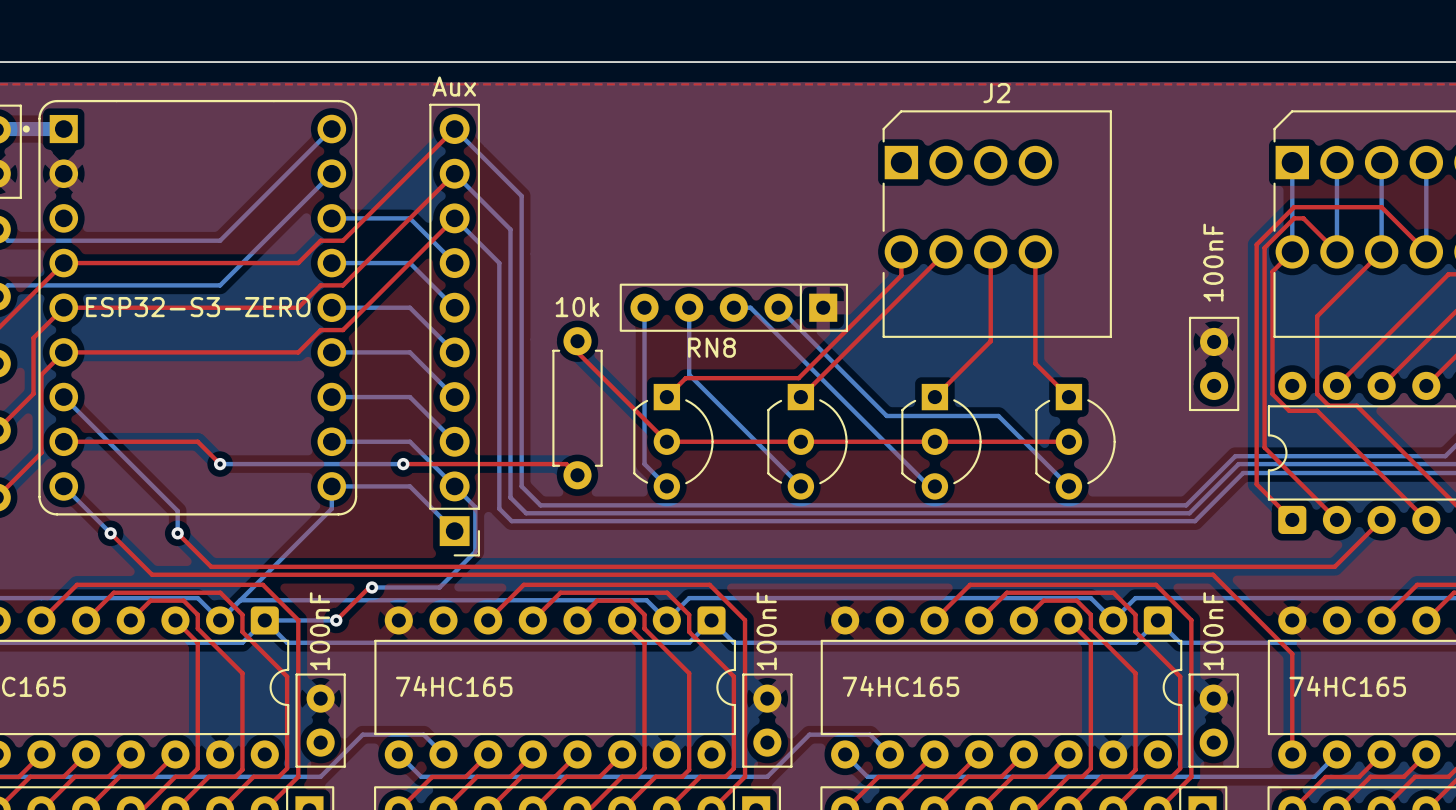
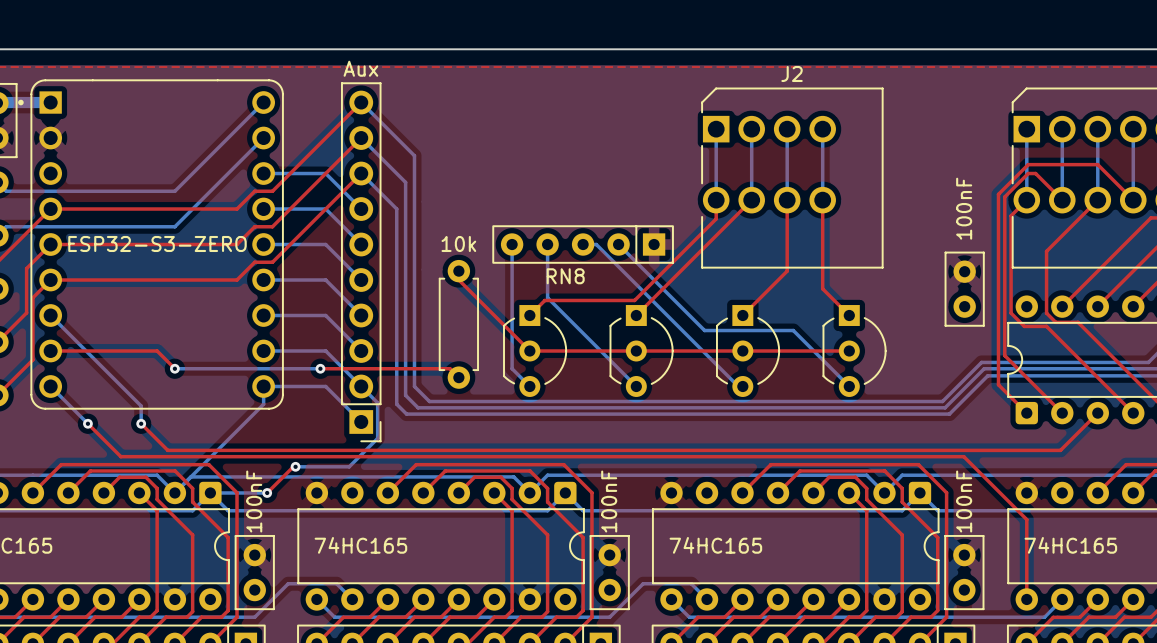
bottom track: none -> (716, 129) (716, 200)
bottom track: none -> (751, 129) (751, 200)
bottom track: none -> (787, 129) (787, 200)
bottom track: none -> (822, 129) (822, 200)

